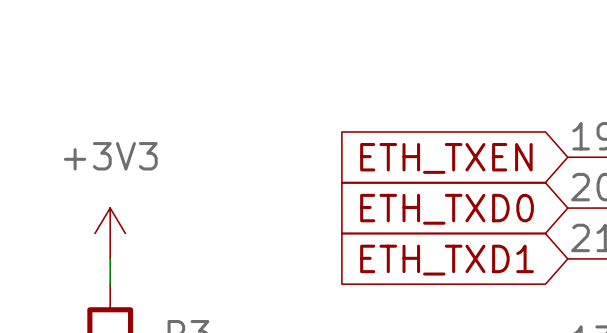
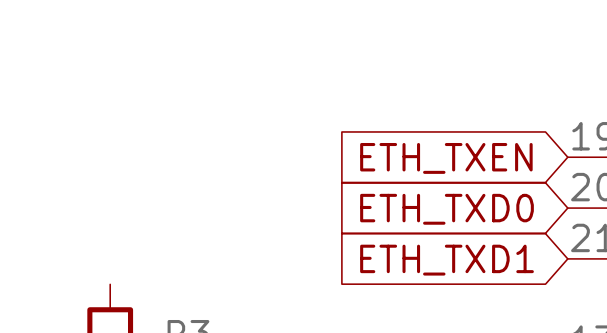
power symbol: +3V3 (110, 233) -> none
wire: (110, 258) (110, 284) -> none

